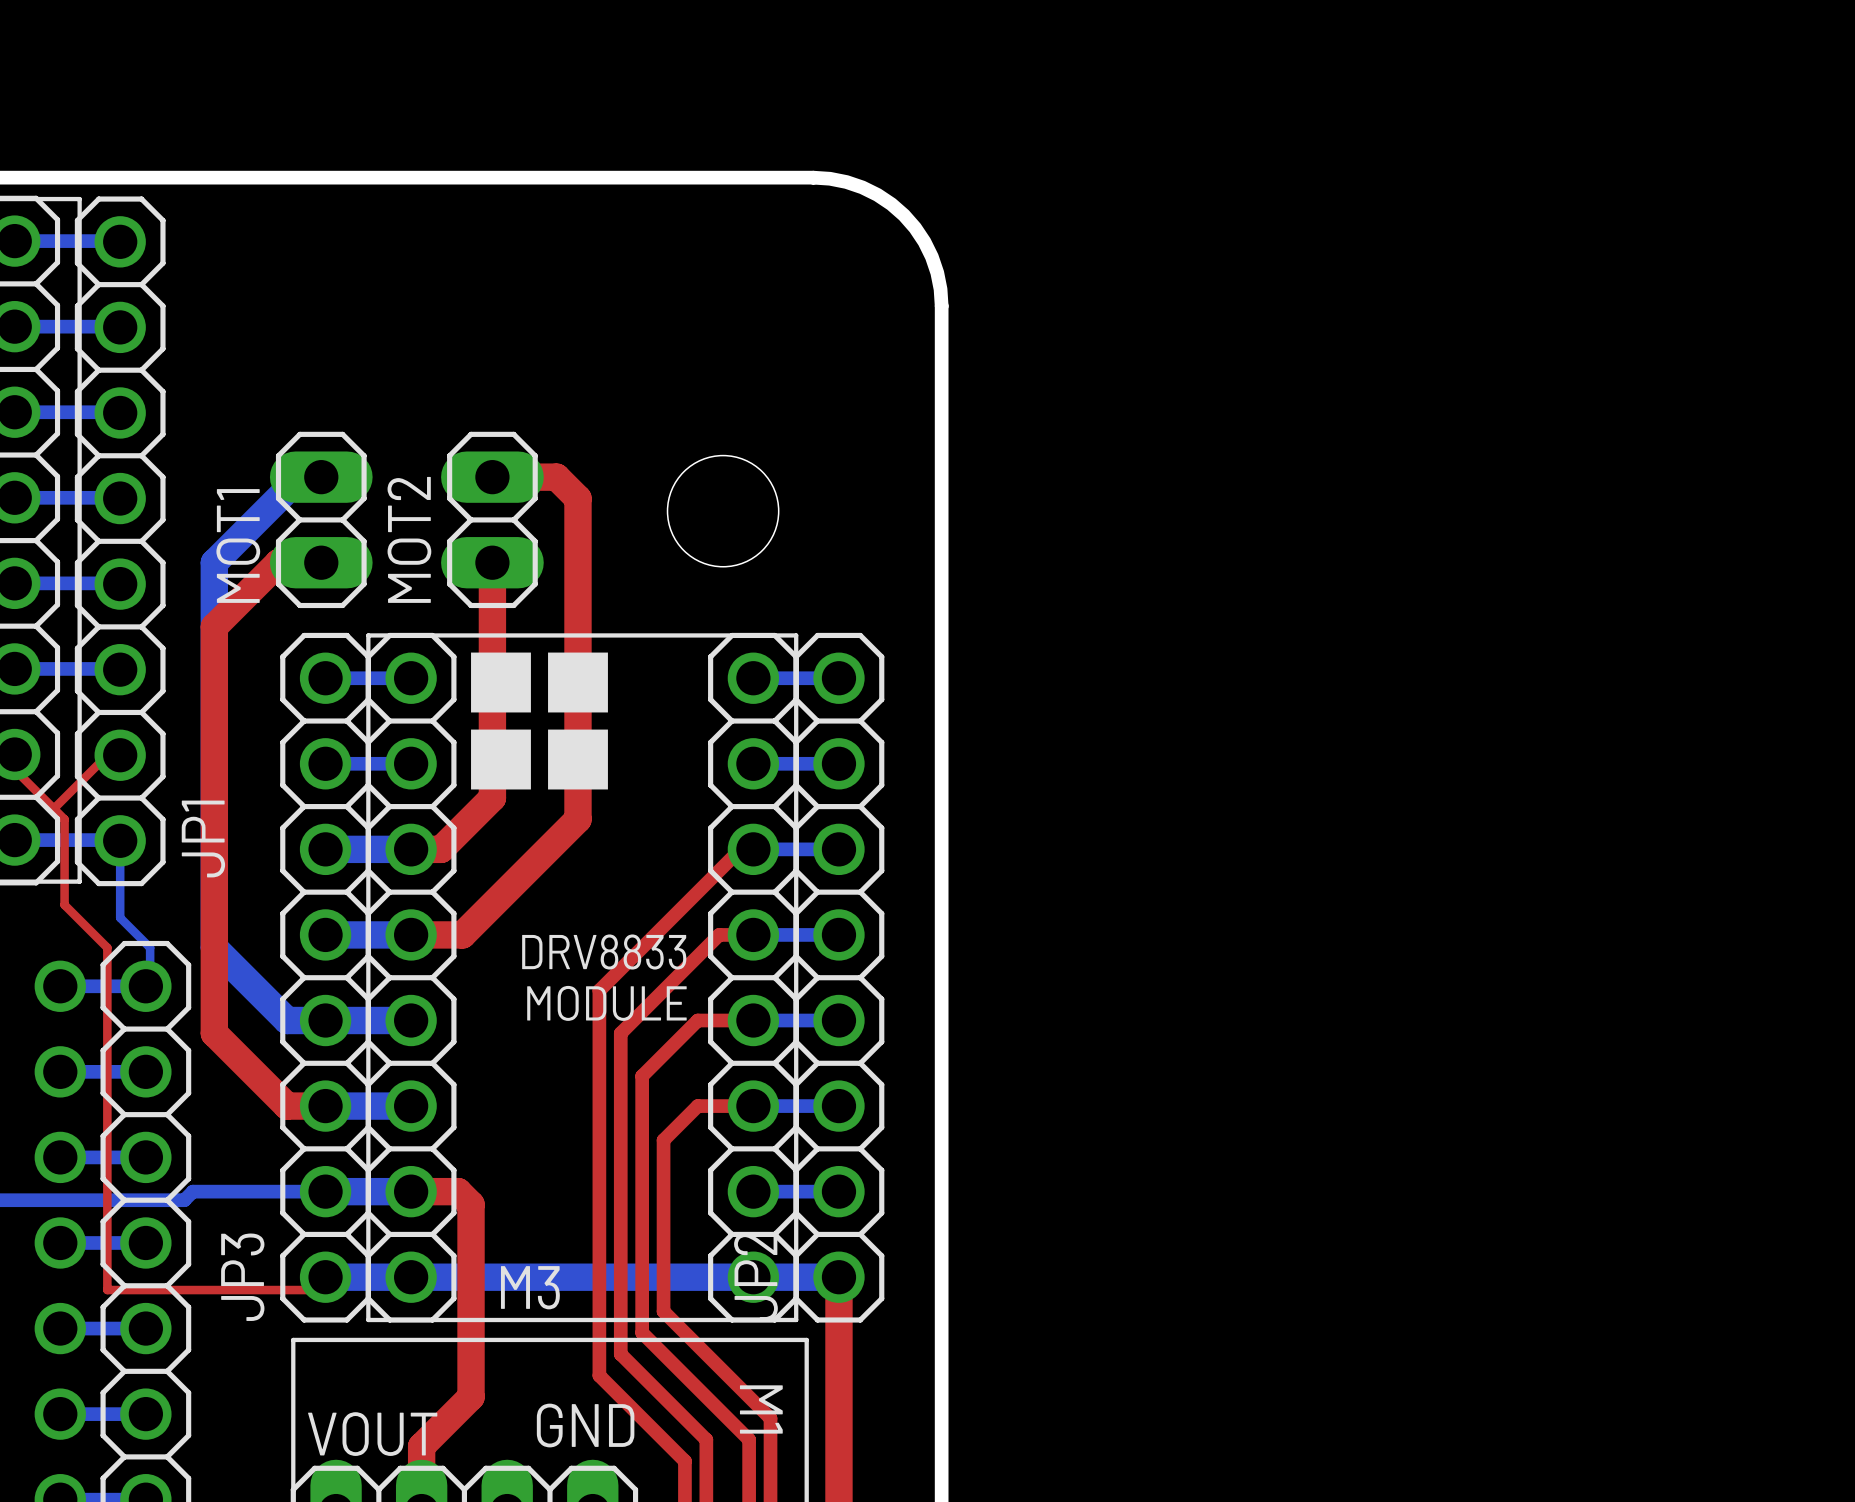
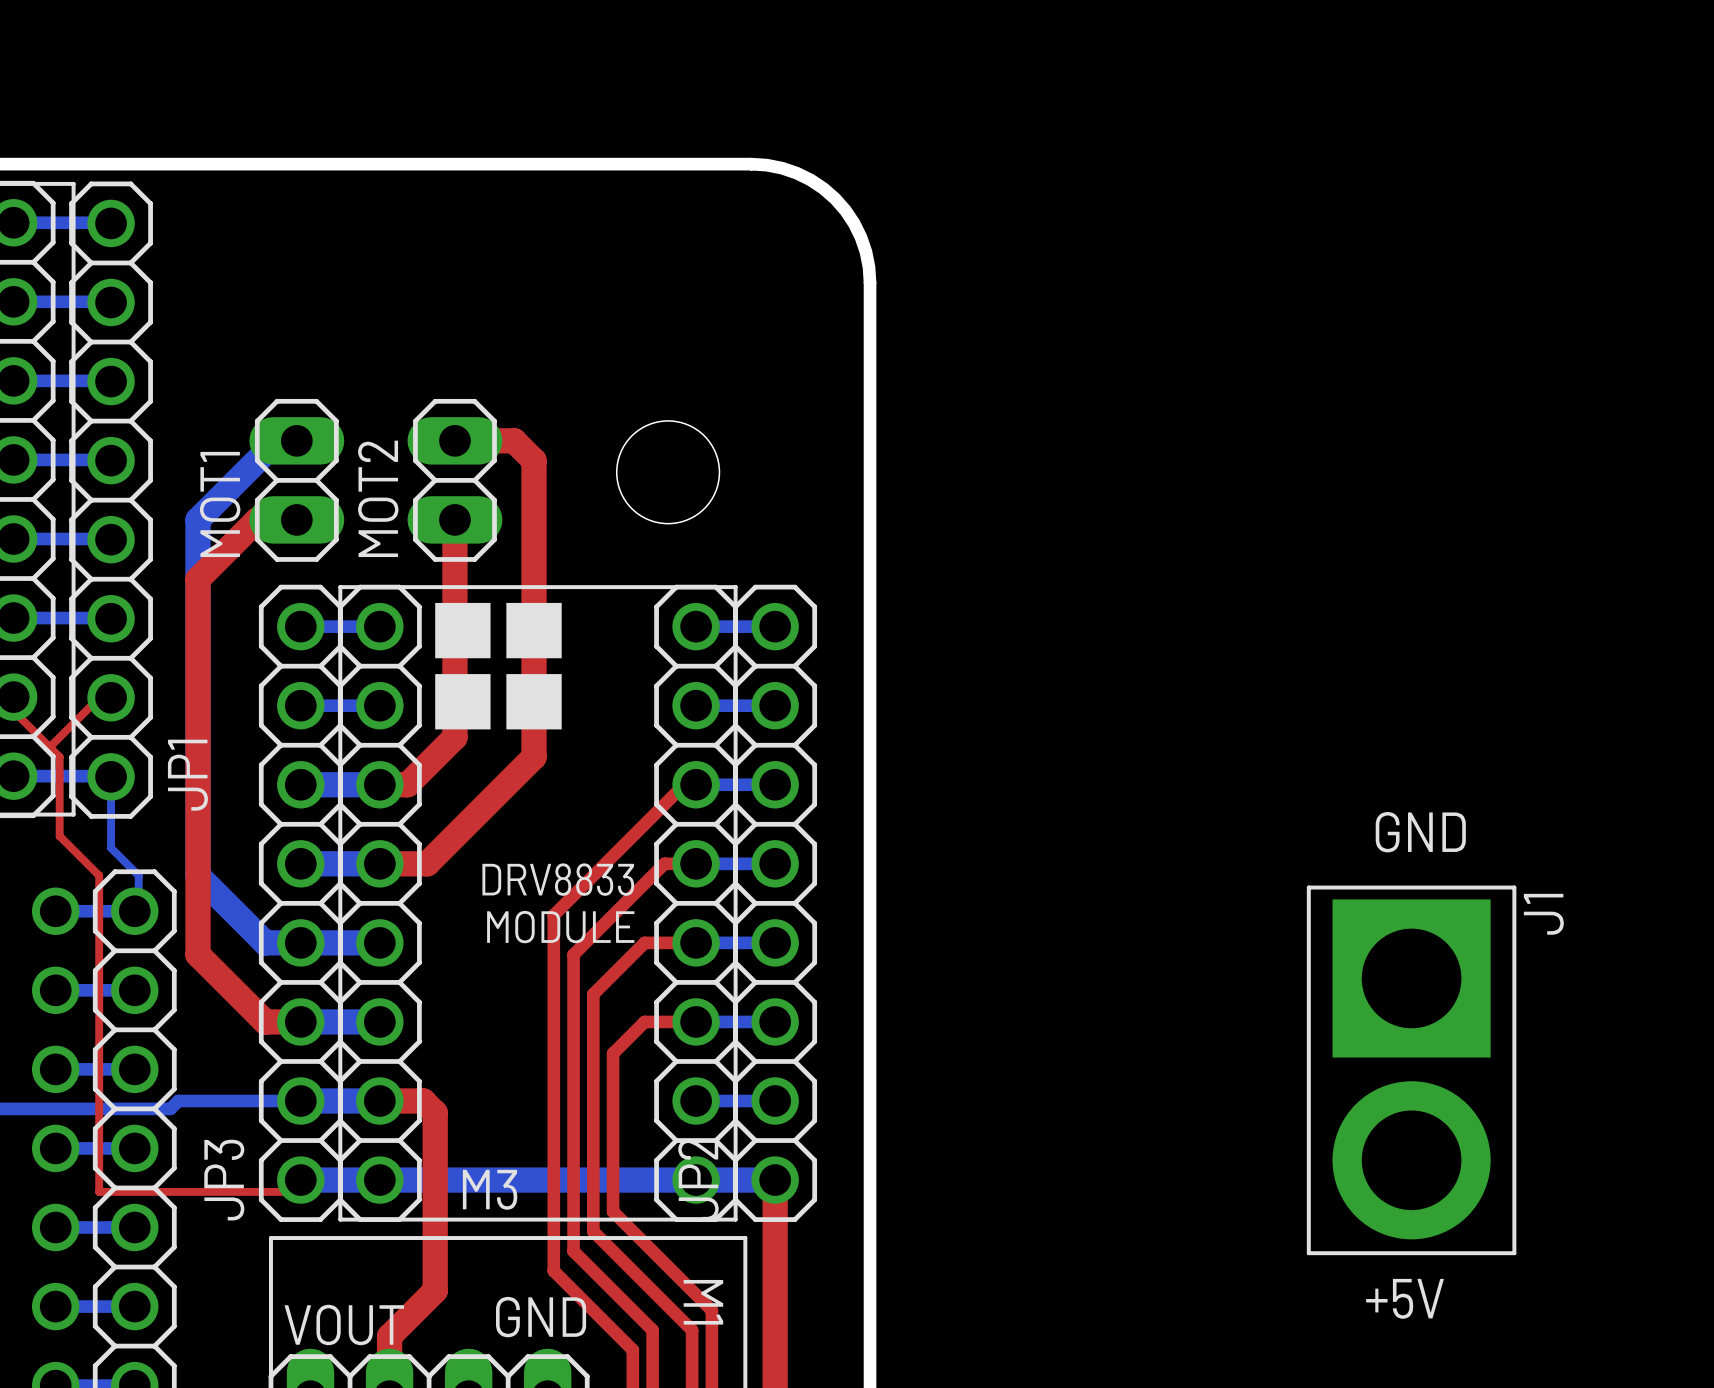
J1: none -> (1411, 1070)

